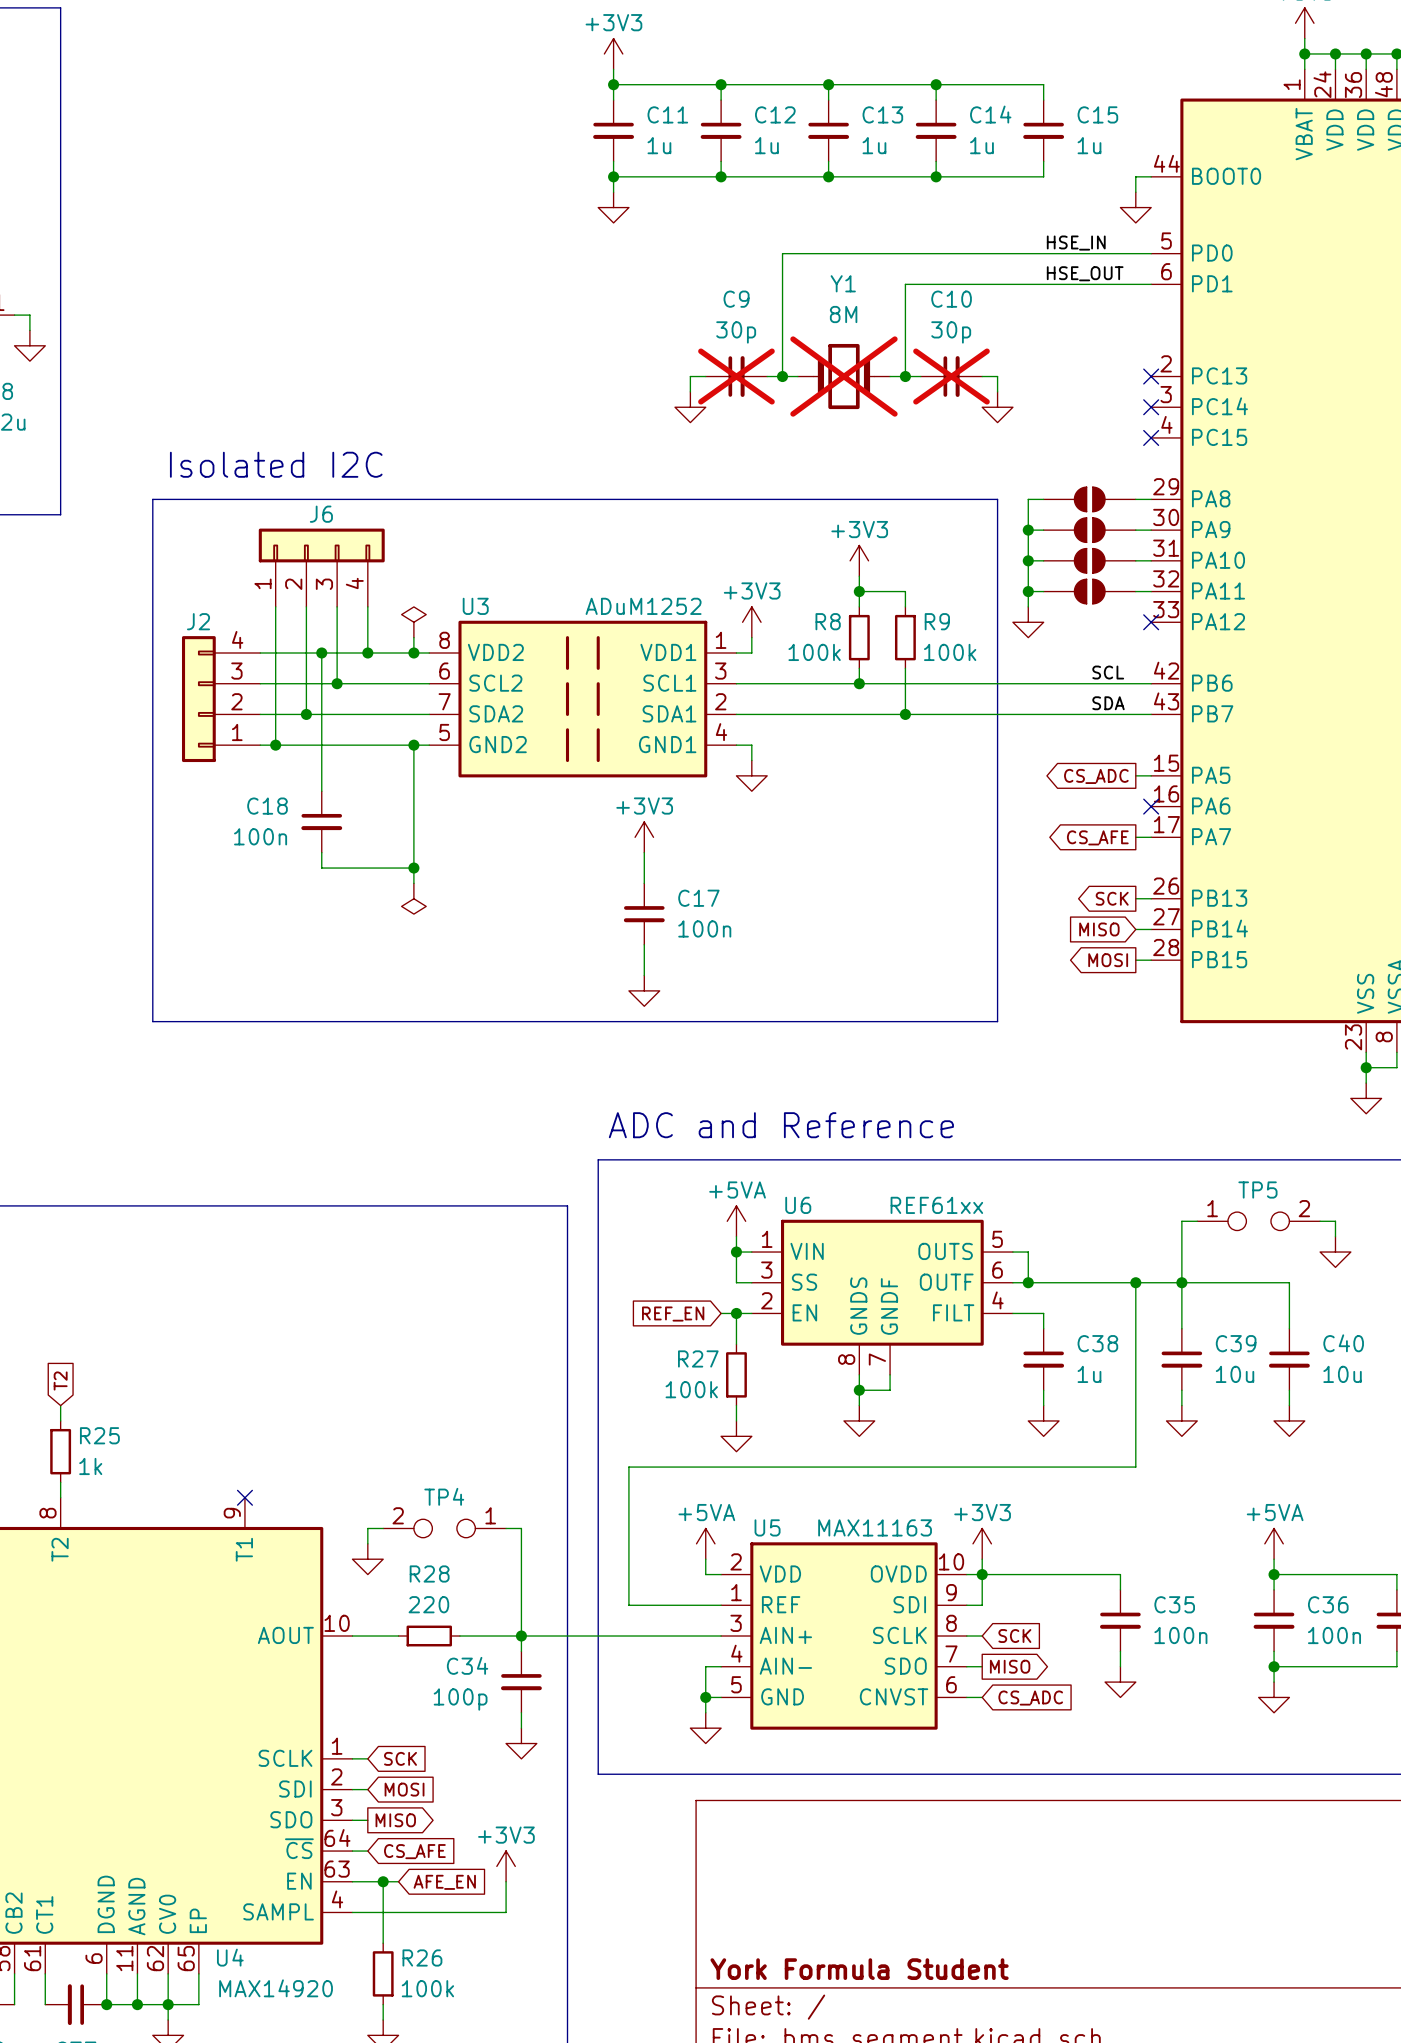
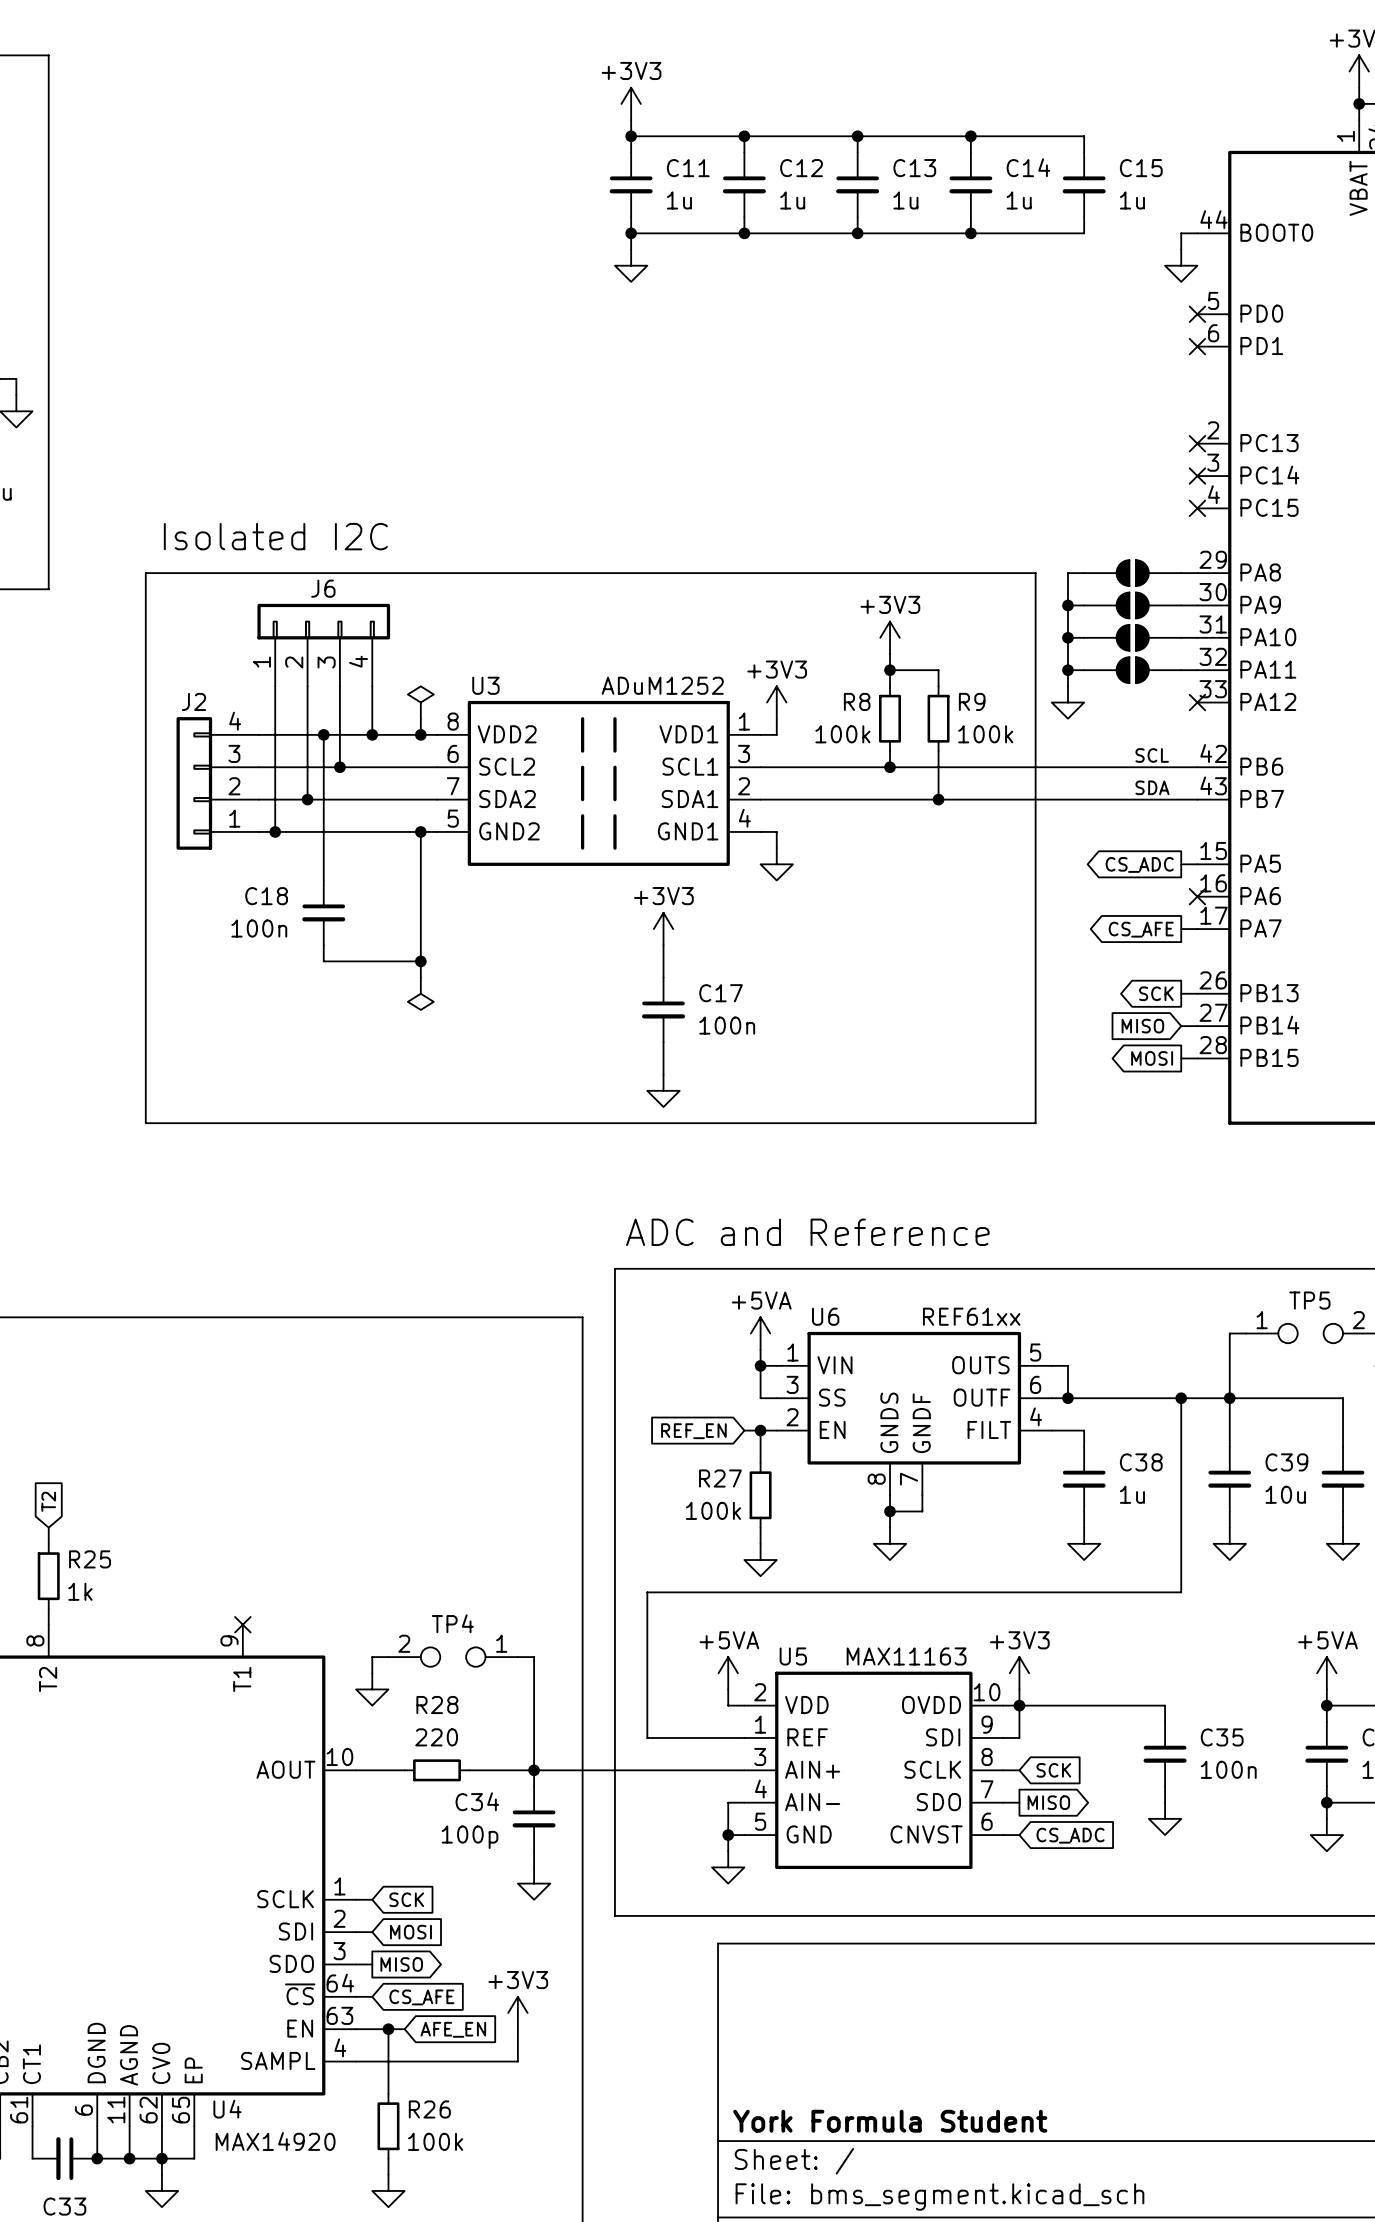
label: HSE_IN (1076, 243) -> none
wire: (1151, 253) (782, 253) (782, 376) -> none
no-connect mark: none -> (1197, 314)
label: HSE_OUT (1085, 273) -> none
wire: (1151, 284) (905, 284) (905, 376) -> none
no-connect mark: none -> (1197, 346)
wire: (705, 376) (690, 376) (690, 391) -> none
C9: 30p (736, 376) -> none
wire: (767, 376) (797, 376) -> none
junction: (782, 376) -> none
Y1: 8M (843, 376) -> none
wire: (890, 376) (920, 376) -> none
junction: (905, 376) -> none
C10: 30p (951, 376) -> none
wire: (982, 376) (997, 376) (997, 391) -> none
power symbol: (690, 407) -> none
power symbol: (997, 407) -> none

